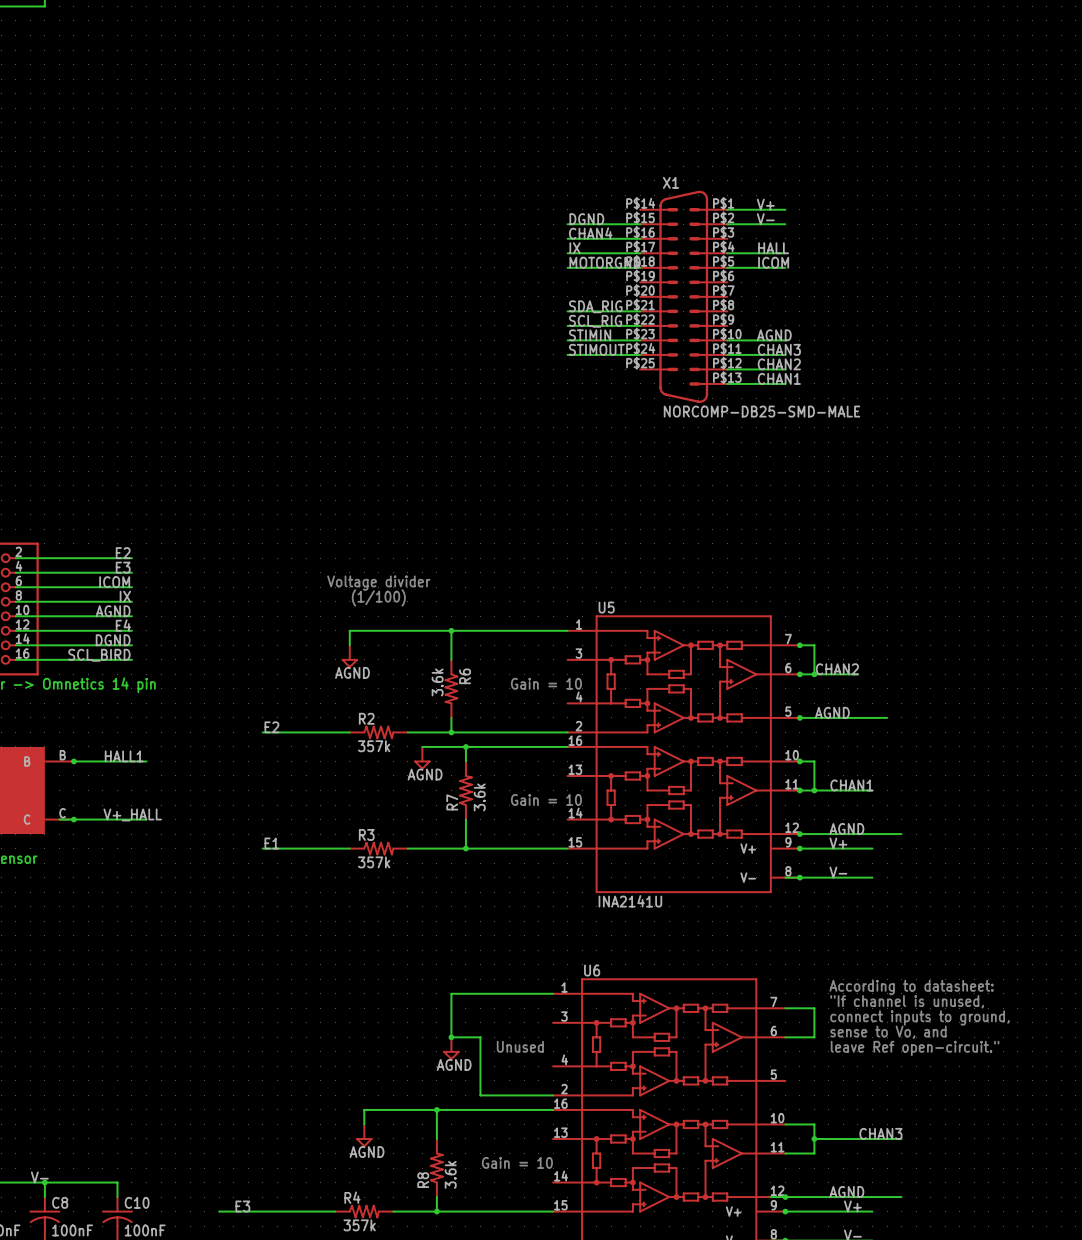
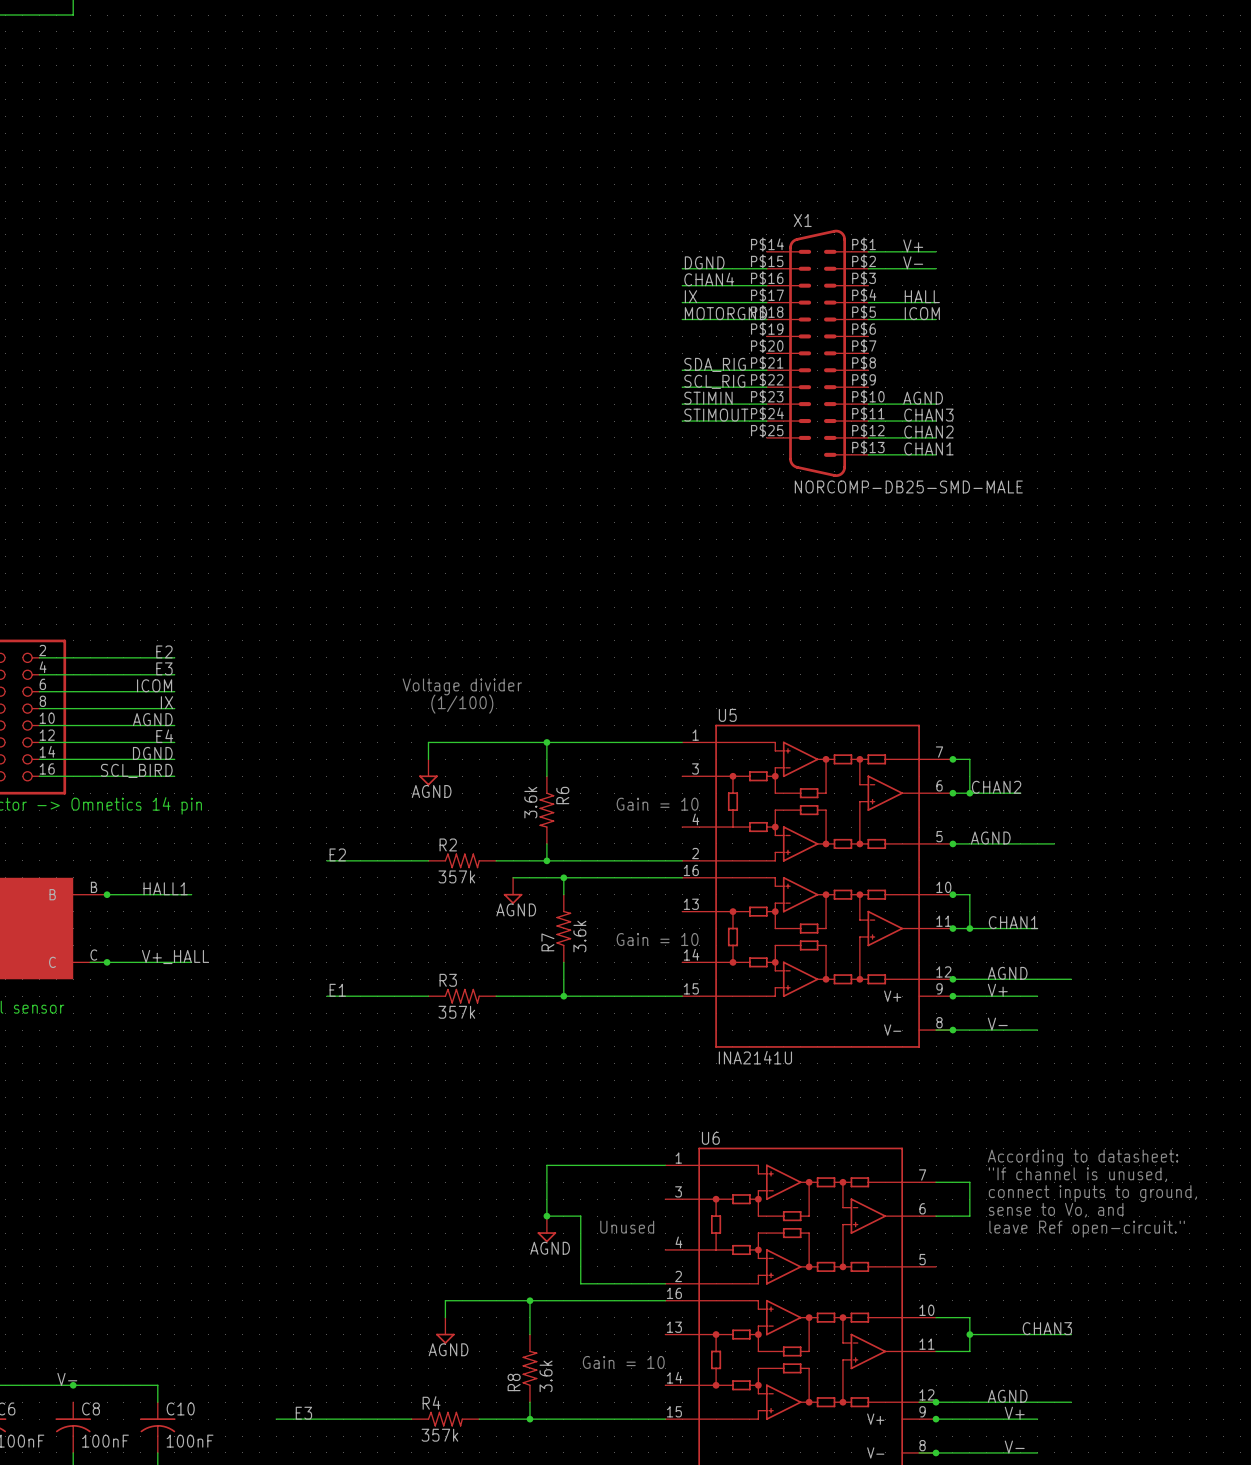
wire: (44, 1182) (44, 1197) -> none

